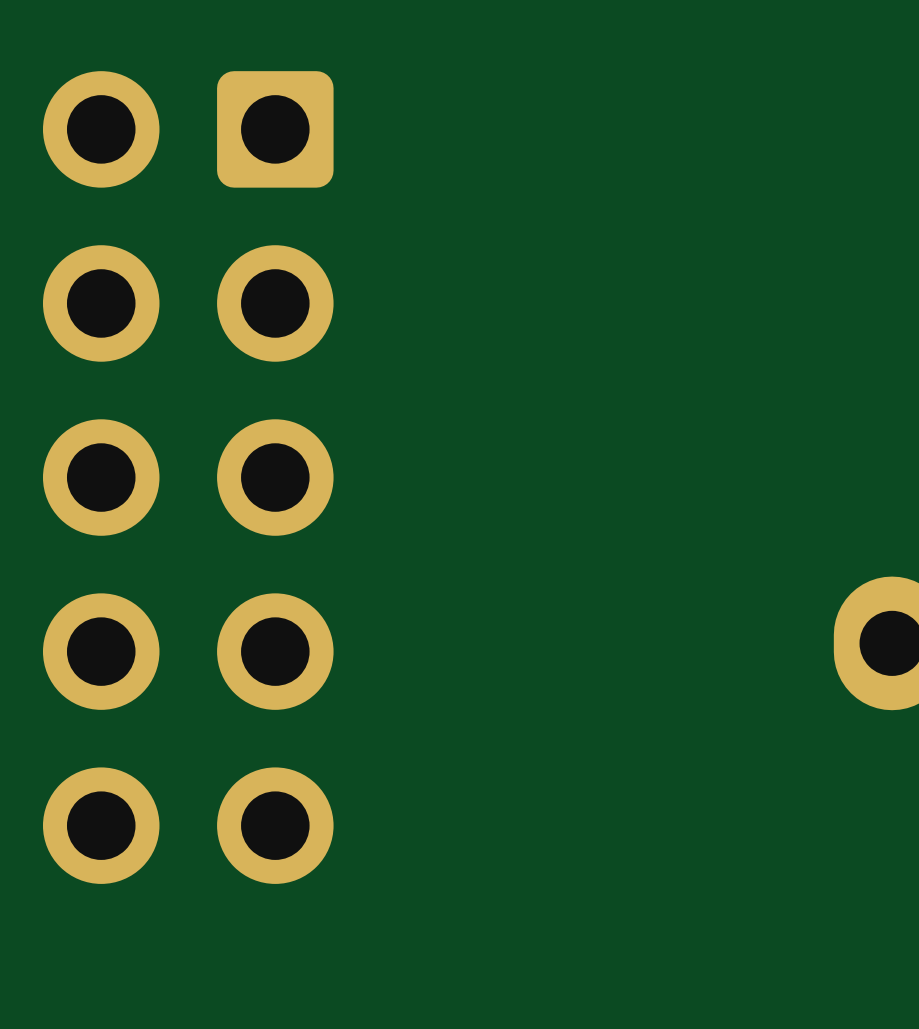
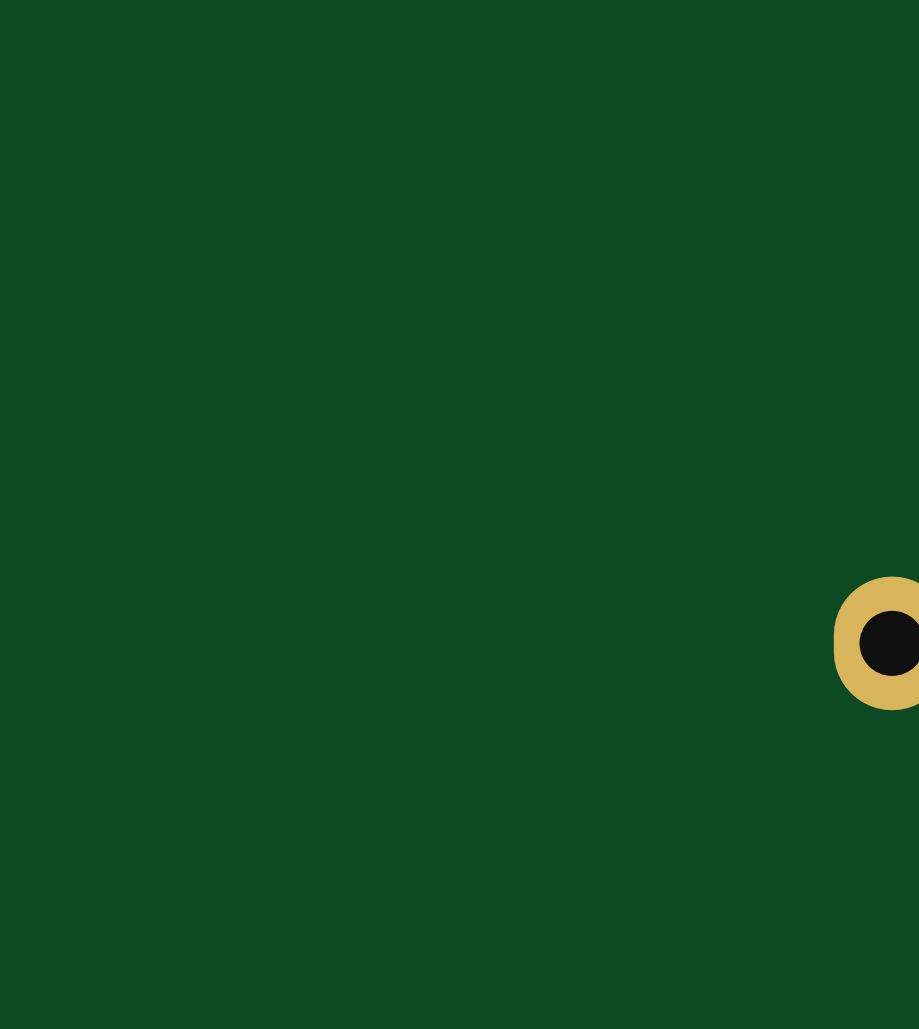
part: (188, 477) -> none

